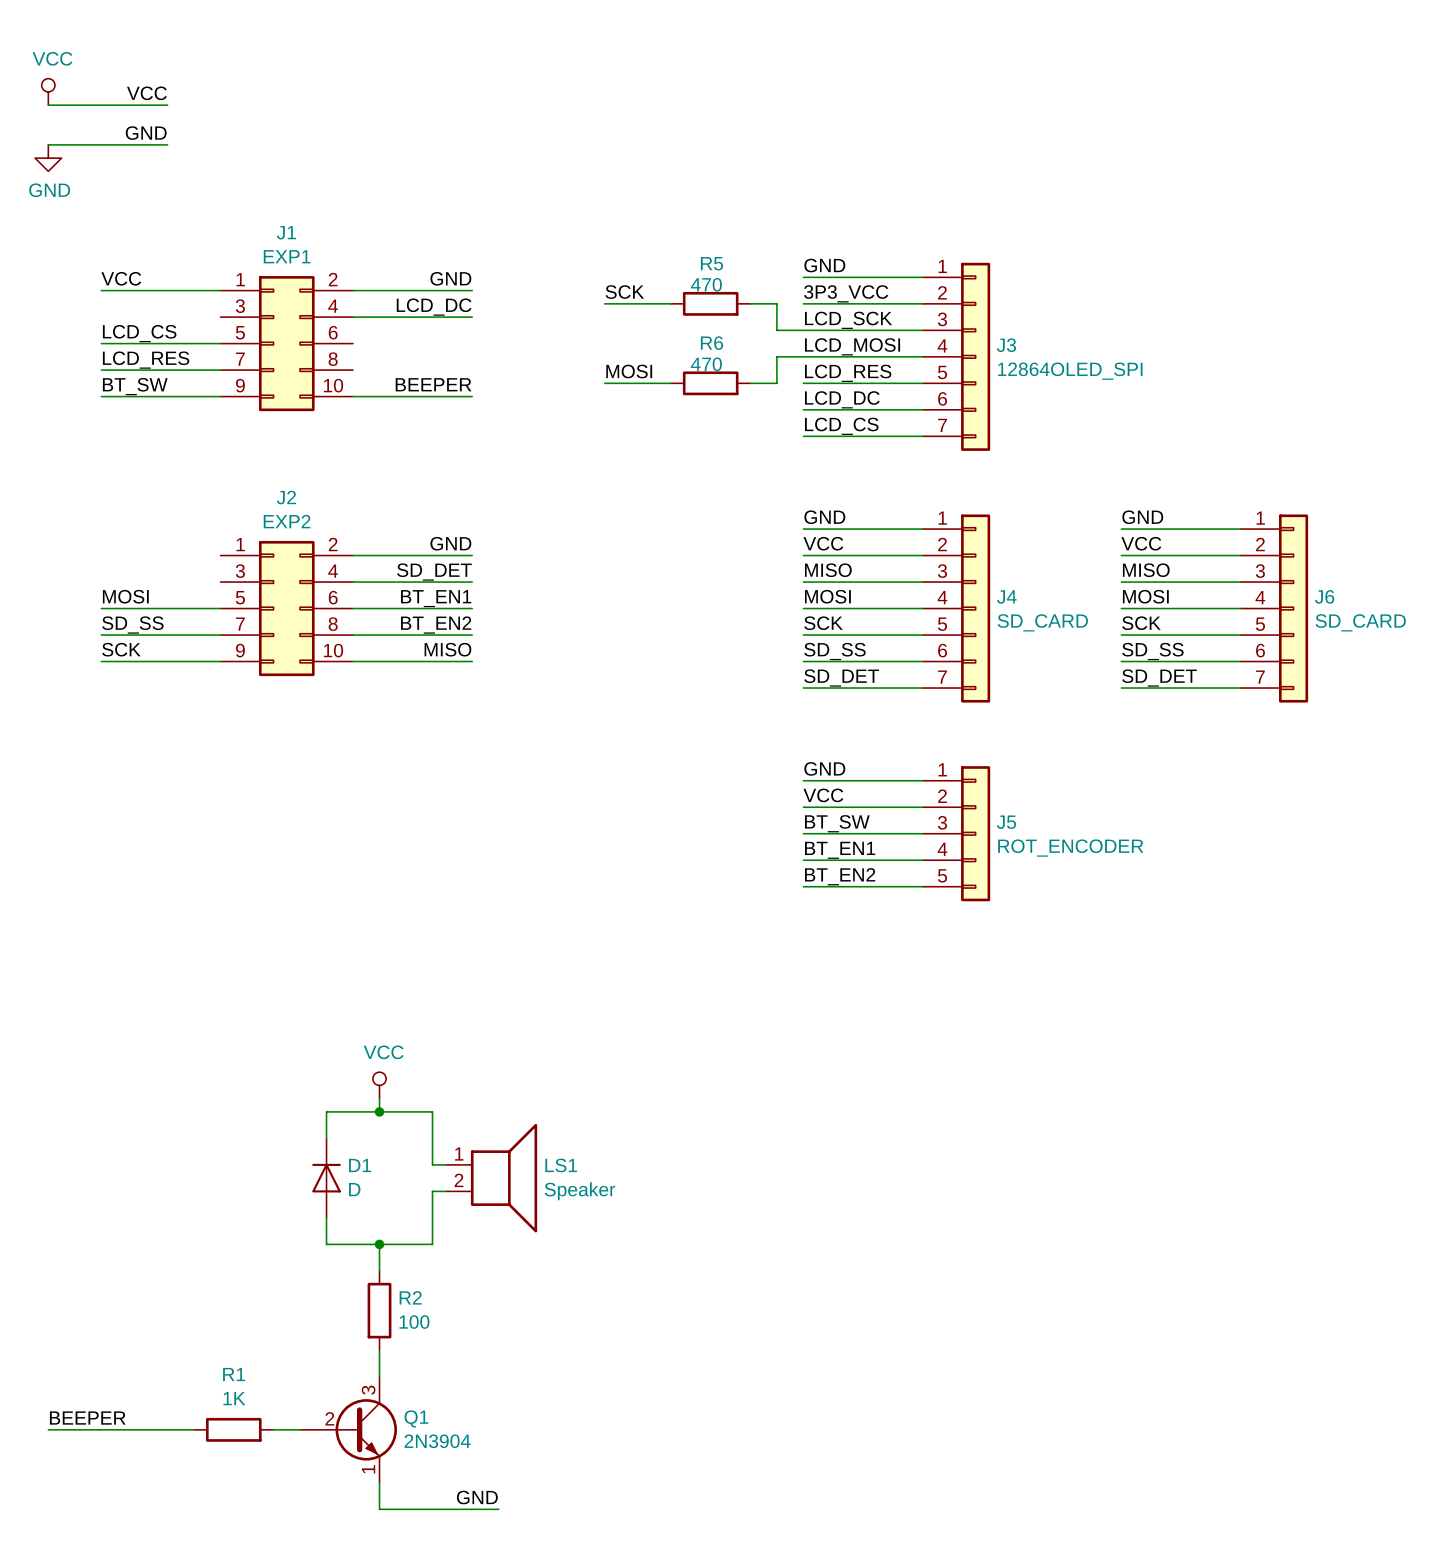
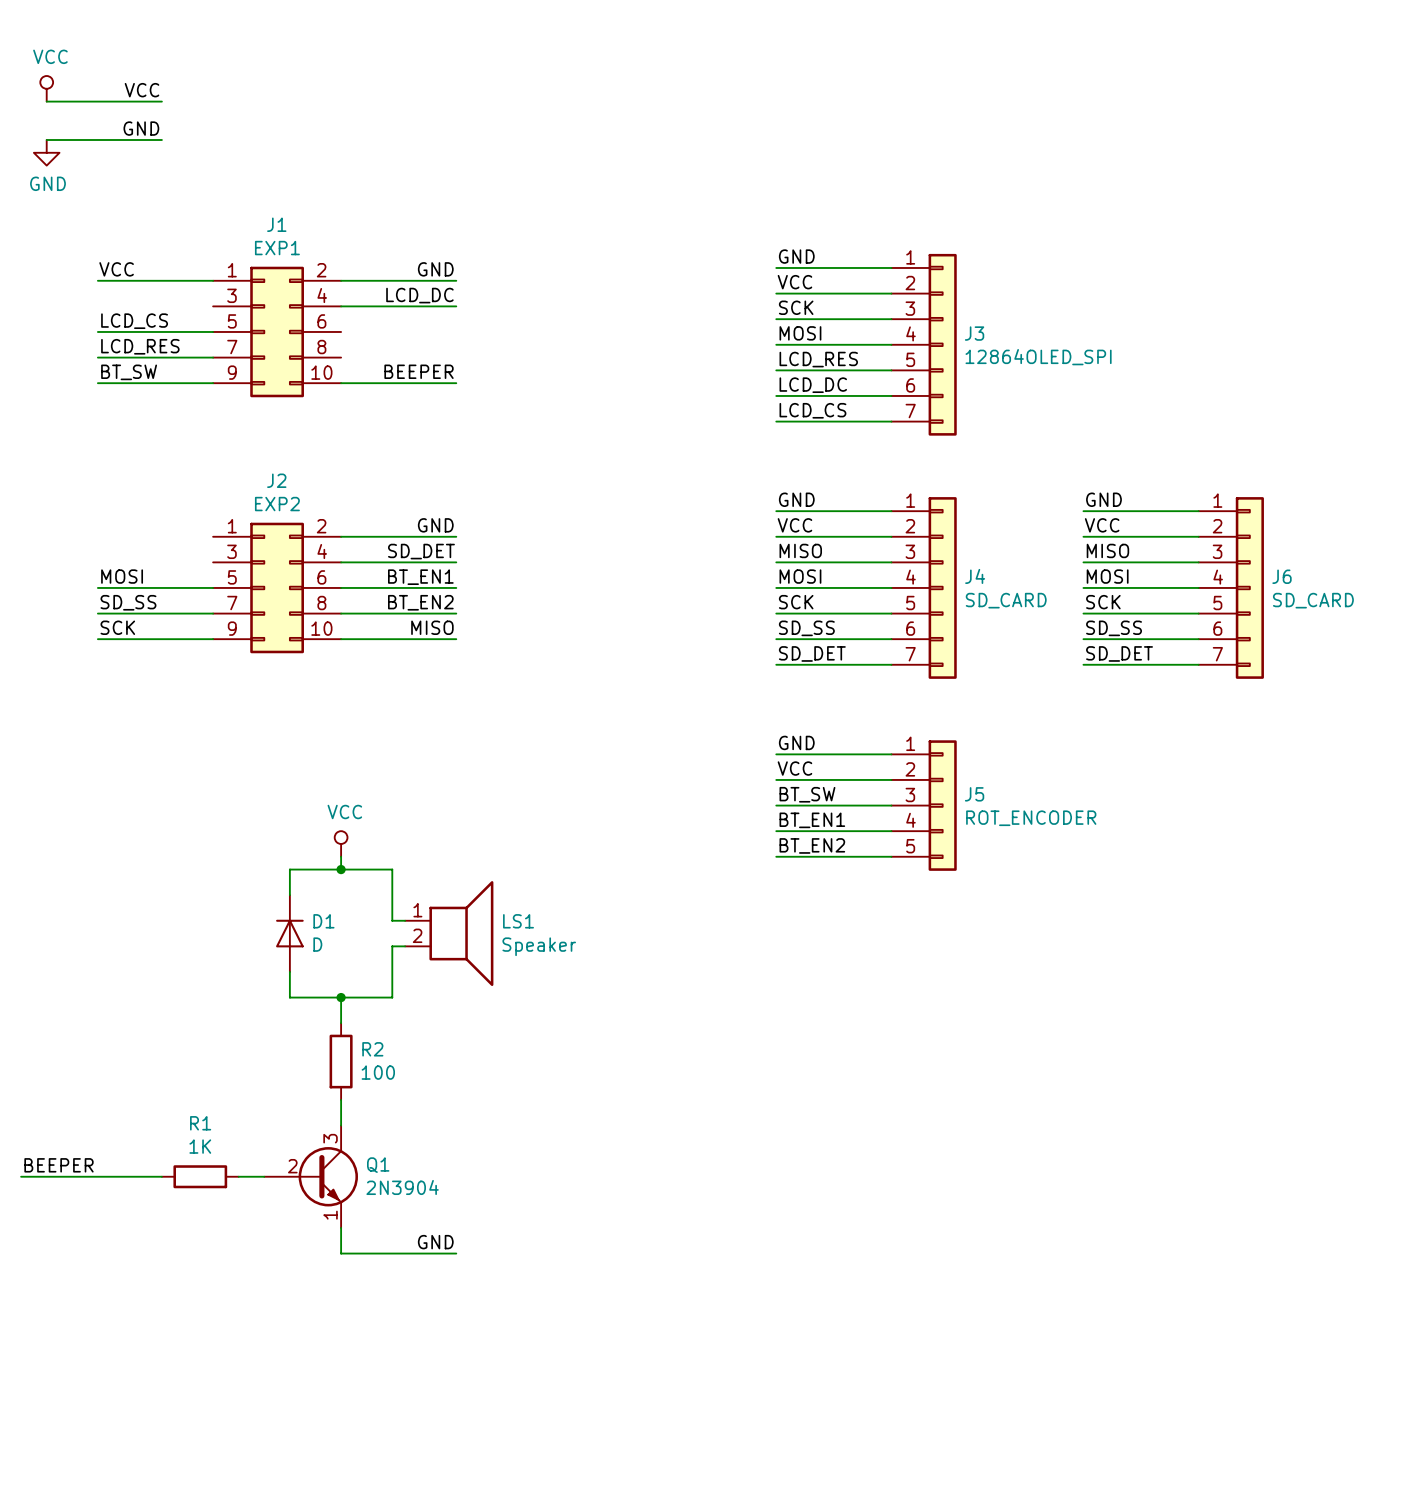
label: SCK (624, 292) -> none
label: 3P3_VCC (846, 293) -> VCC (794, 282)
wire: (604, 303) (670, 303) -> none
R5: 470 (710, 303) -> none
wire: (750, 303) (776, 303) (776, 330) (803, 330) -> none
label: LCD_SCK (848, 320) -> SCK (796, 307)
label: LCD_MOSI (852, 346) -> MOSI (800, 333)
wire: (803, 356) (776, 356) (776, 383) (750, 383) -> none
label: MOSI (629, 371) -> none
wire: (604, 383) (670, 383) -> none
R6: 470 (710, 383) -> none
junction: none -> (341, 869)
junction: none -> (341, 997)
power symbol position: VCC (379, 1085) -> VCC (341, 843)
wire: (379, 1098) (379, 1111) -> (341, 856) (341, 869)
junction: (379, 1111) -> none
wire: (326, 1138) (326, 1111) (432, 1111) (432, 1164) (445, 1164) -> (289, 895) (289, 869) (392, 869) (392, 920) (405, 920)
D1 position: (326, 1178) -> (289, 933)
LS1 position: (491, 1178) -> (449, 933)
wire: (445, 1191) (432, 1191) (432, 1244) (326, 1244) (326, 1217) -> (405, 946) (392, 946) (392, 997) (289, 997) (289, 971)
wire: (379, 1244) (379, 1270) -> (341, 997) (341, 1023)
junction: (379, 1244) -> none
R2 position: (379, 1310) -> (341, 1061)
wire: (379, 1350) (379, 1376) -> (341, 1099) (341, 1125)
label position: BEEPER (87, 1418) -> BEEPER (58, 1165)
wire: (48, 1429) (194, 1429) -> (21, 1176) (161, 1176)
R1 position: (233, 1429) -> (200, 1176)
wire: (273, 1429) (300, 1429) -> (238, 1176) (264, 1176)
Q1 position: (348, 1429) -> (311, 1176)
wire: (379, 1482) (379, 1509) (498, 1509) -> (341, 1227) (341, 1253) (456, 1253)
label position: GND (477, 1497) -> GND (435, 1242)

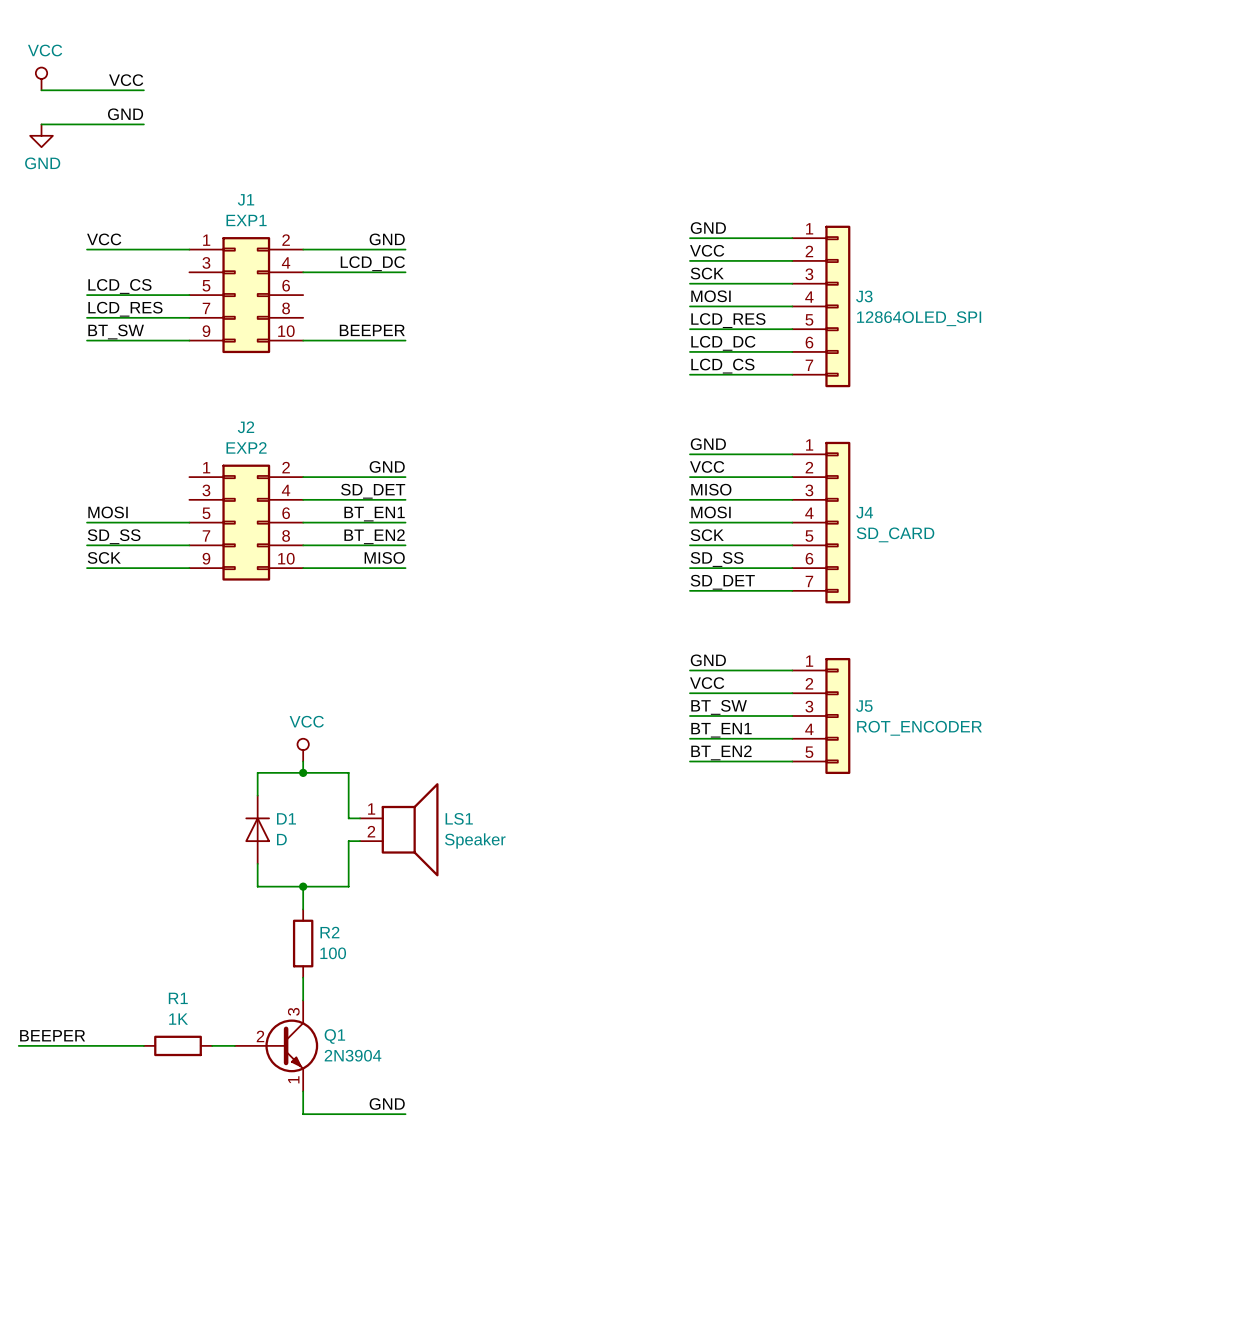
label: GND (1103, 499) -> none
wire: (1083, 511) (1198, 511) -> none
label: VCC (1102, 525) -> none
wire: (1083, 536) (1198, 536) -> none
label: MISO (1107, 550) -> none
wire: (1083, 562) (1198, 562) -> none
label: MOSI (1107, 576) -> none
wire: (1083, 587) (1198, 587) -> none
J6: SD_CARD (1231, 587) -> none
label: SCK (1103, 602) -> none
wire: (1083, 613) (1198, 613) -> none
label: SD_SS (1114, 628) -> none
wire: (1083, 639) (1198, 639) -> none
label: SD_DET (1119, 653) -> none
wire: (1083, 664) (1198, 664) -> none

